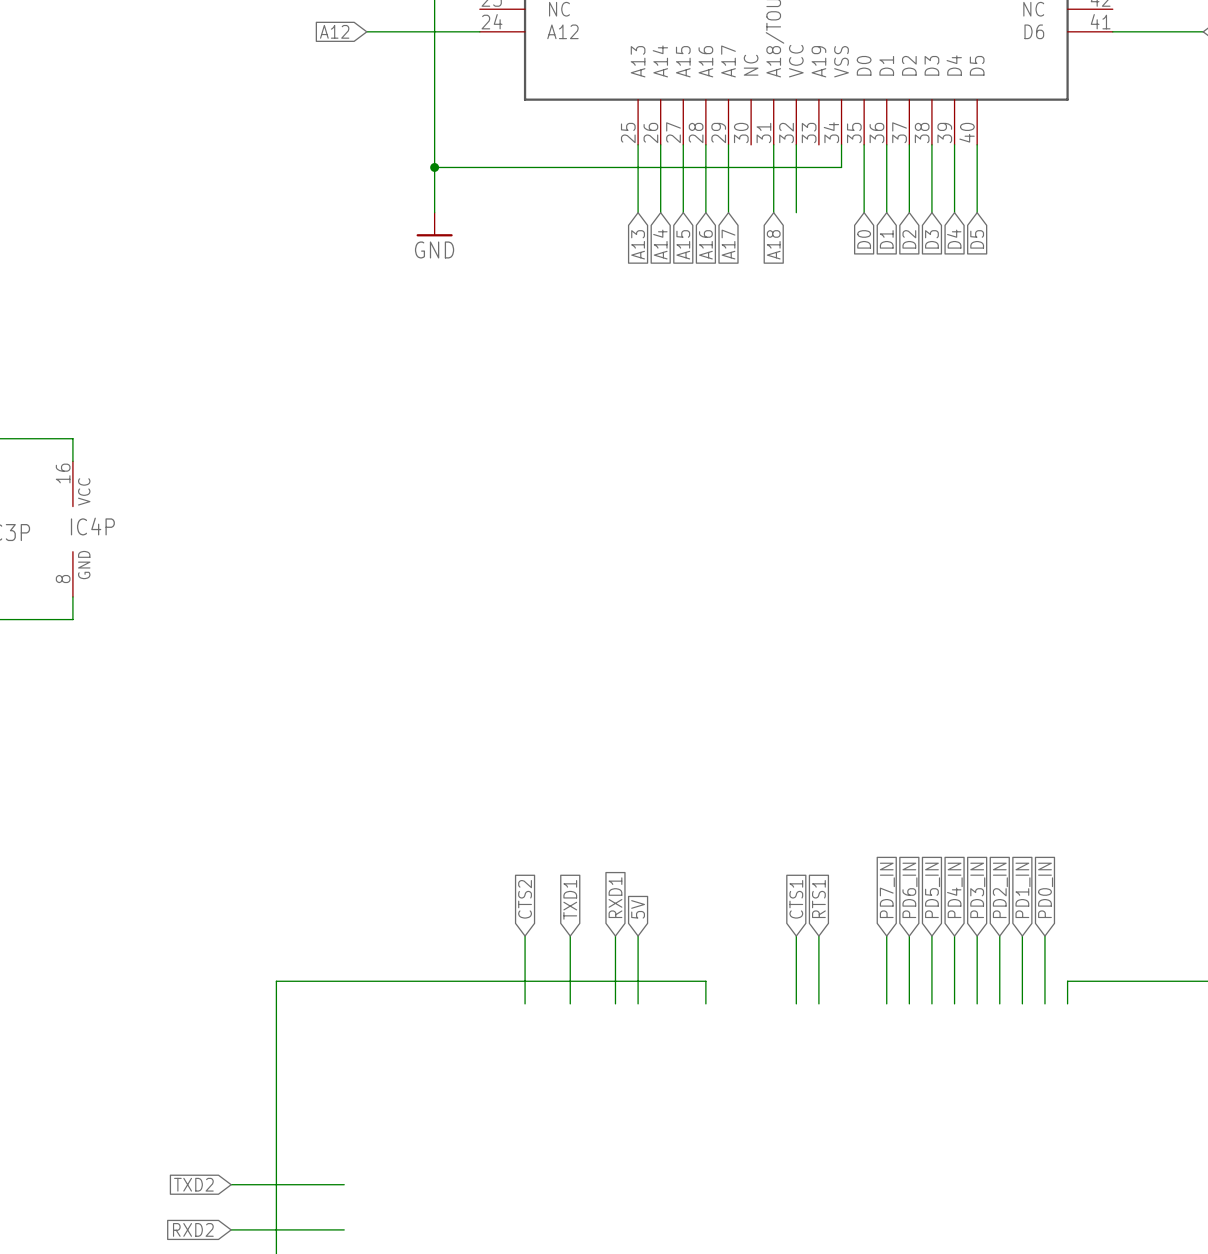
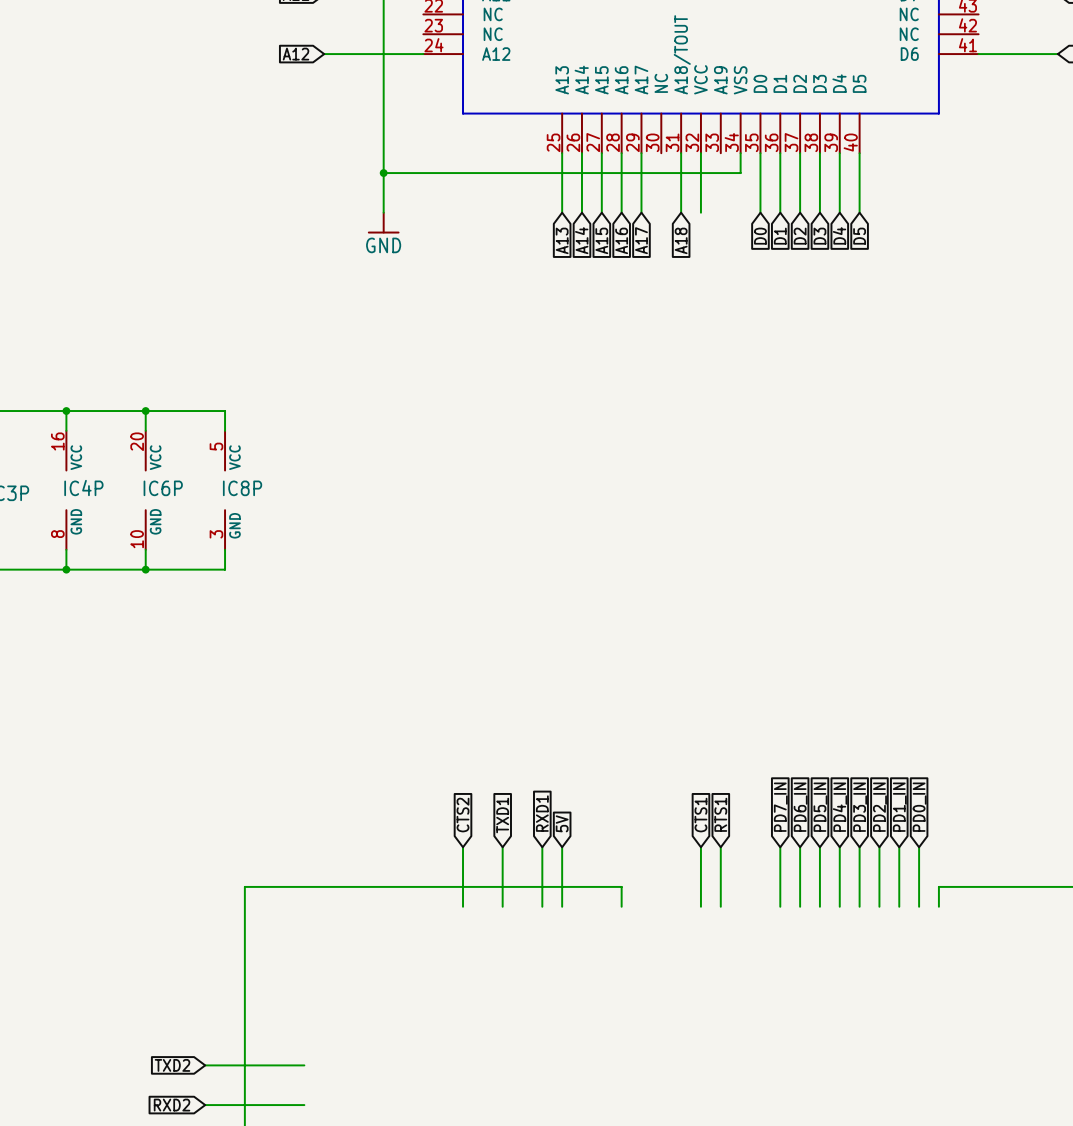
wire: none -> (66, 411) (225, 411) (225, 430)
junction: none -> (66, 411)
wire: none -> (145, 411) (145, 430)
junction: none -> (145, 411)
IC6P: none -> (145, 490)
IC8P: none -> (225, 490)
wire: none -> (145, 549) (145, 569)
wire: none -> (225, 549) (225, 569) (66, 569)
junction: none -> (66, 569)
junction: none -> (145, 569)

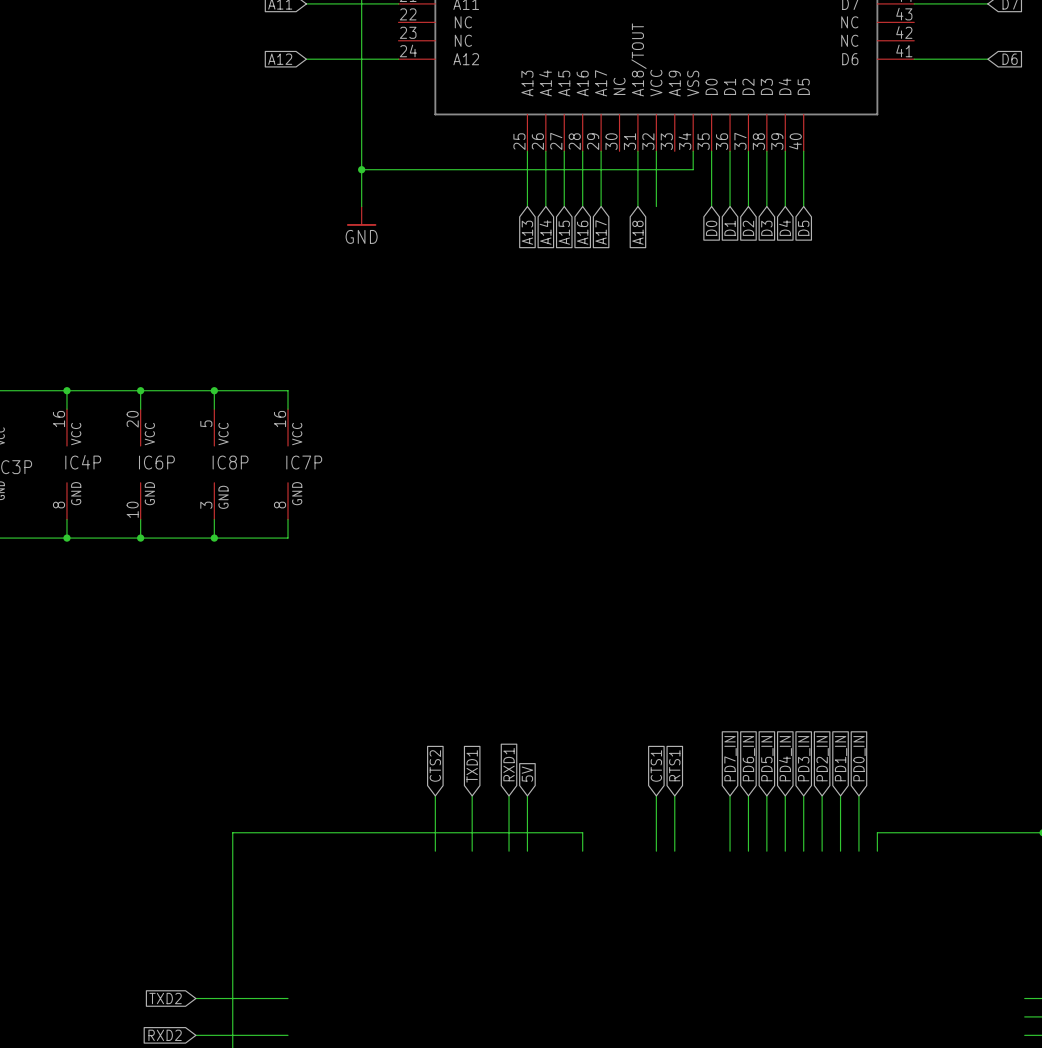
wire: none -> (214, 390) (288, 390) (288, 409)
junction: none -> (214, 390)
IC7P: none -> (288, 464)
wire: none -> (288, 519) (288, 538) (214, 538)
junction: none -> (214, 538)

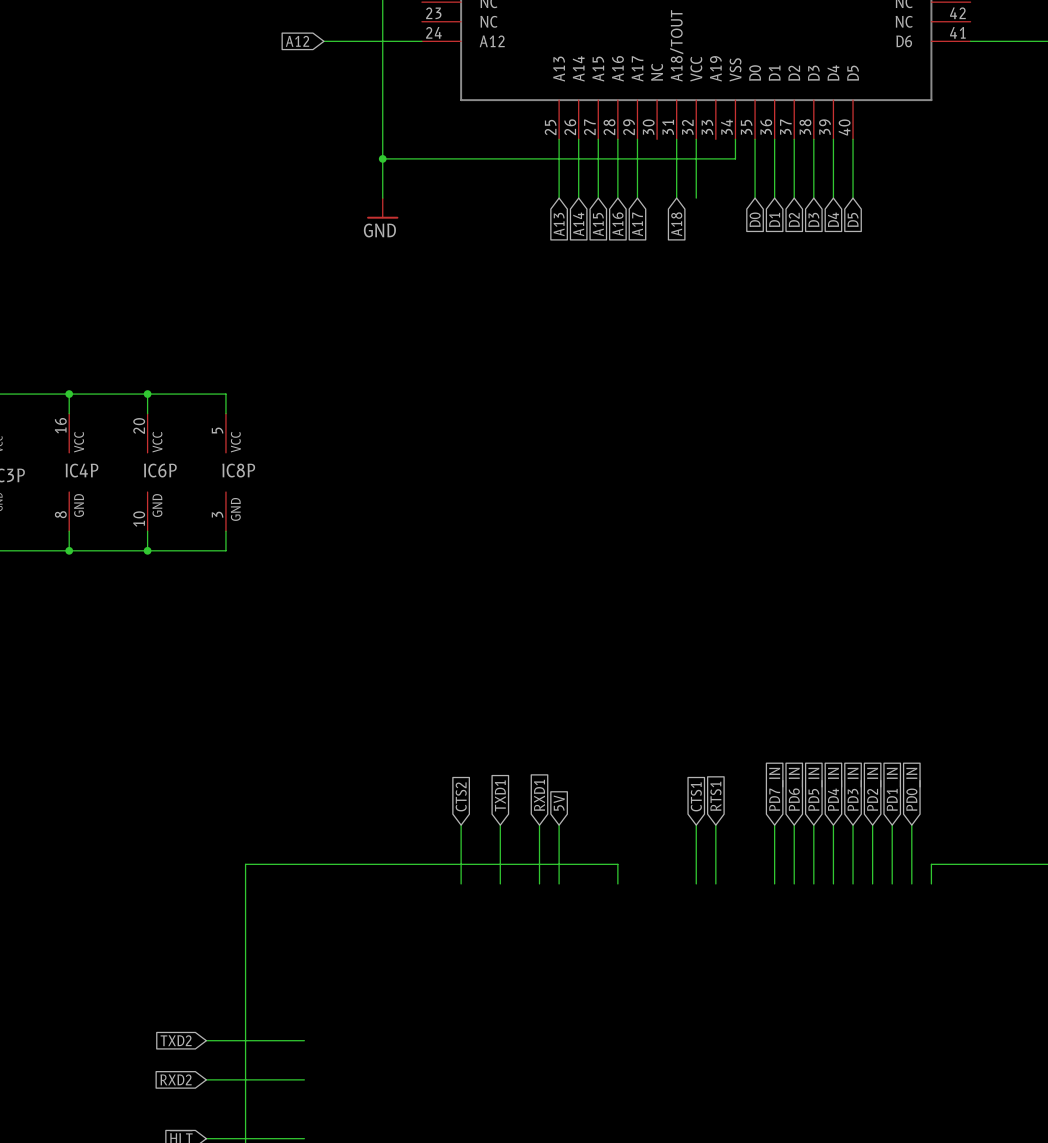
wire: (214, 390) (288, 390) (288, 409) -> none
junction: (214, 390) -> none
IC7P: (288, 464) -> none
wire: (288, 519) (288, 538) (214, 538) -> none
junction: (214, 538) -> none

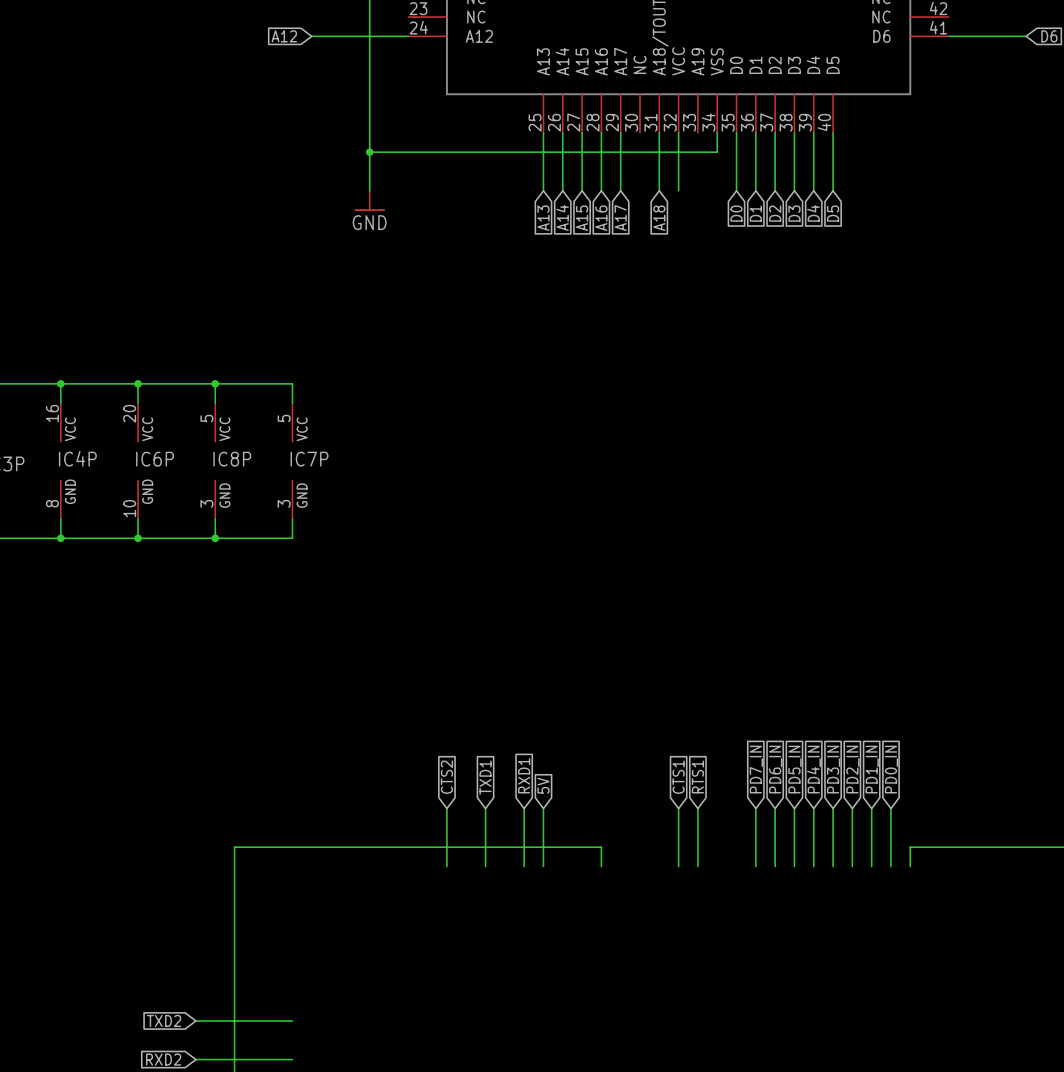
wire: none -> (215, 383) (292, 383) (292, 403)
junction: none -> (215, 383)
IC7P: none -> (292, 461)
wire: none -> (292, 519) (292, 538) (215, 538)
junction: none -> (215, 538)

